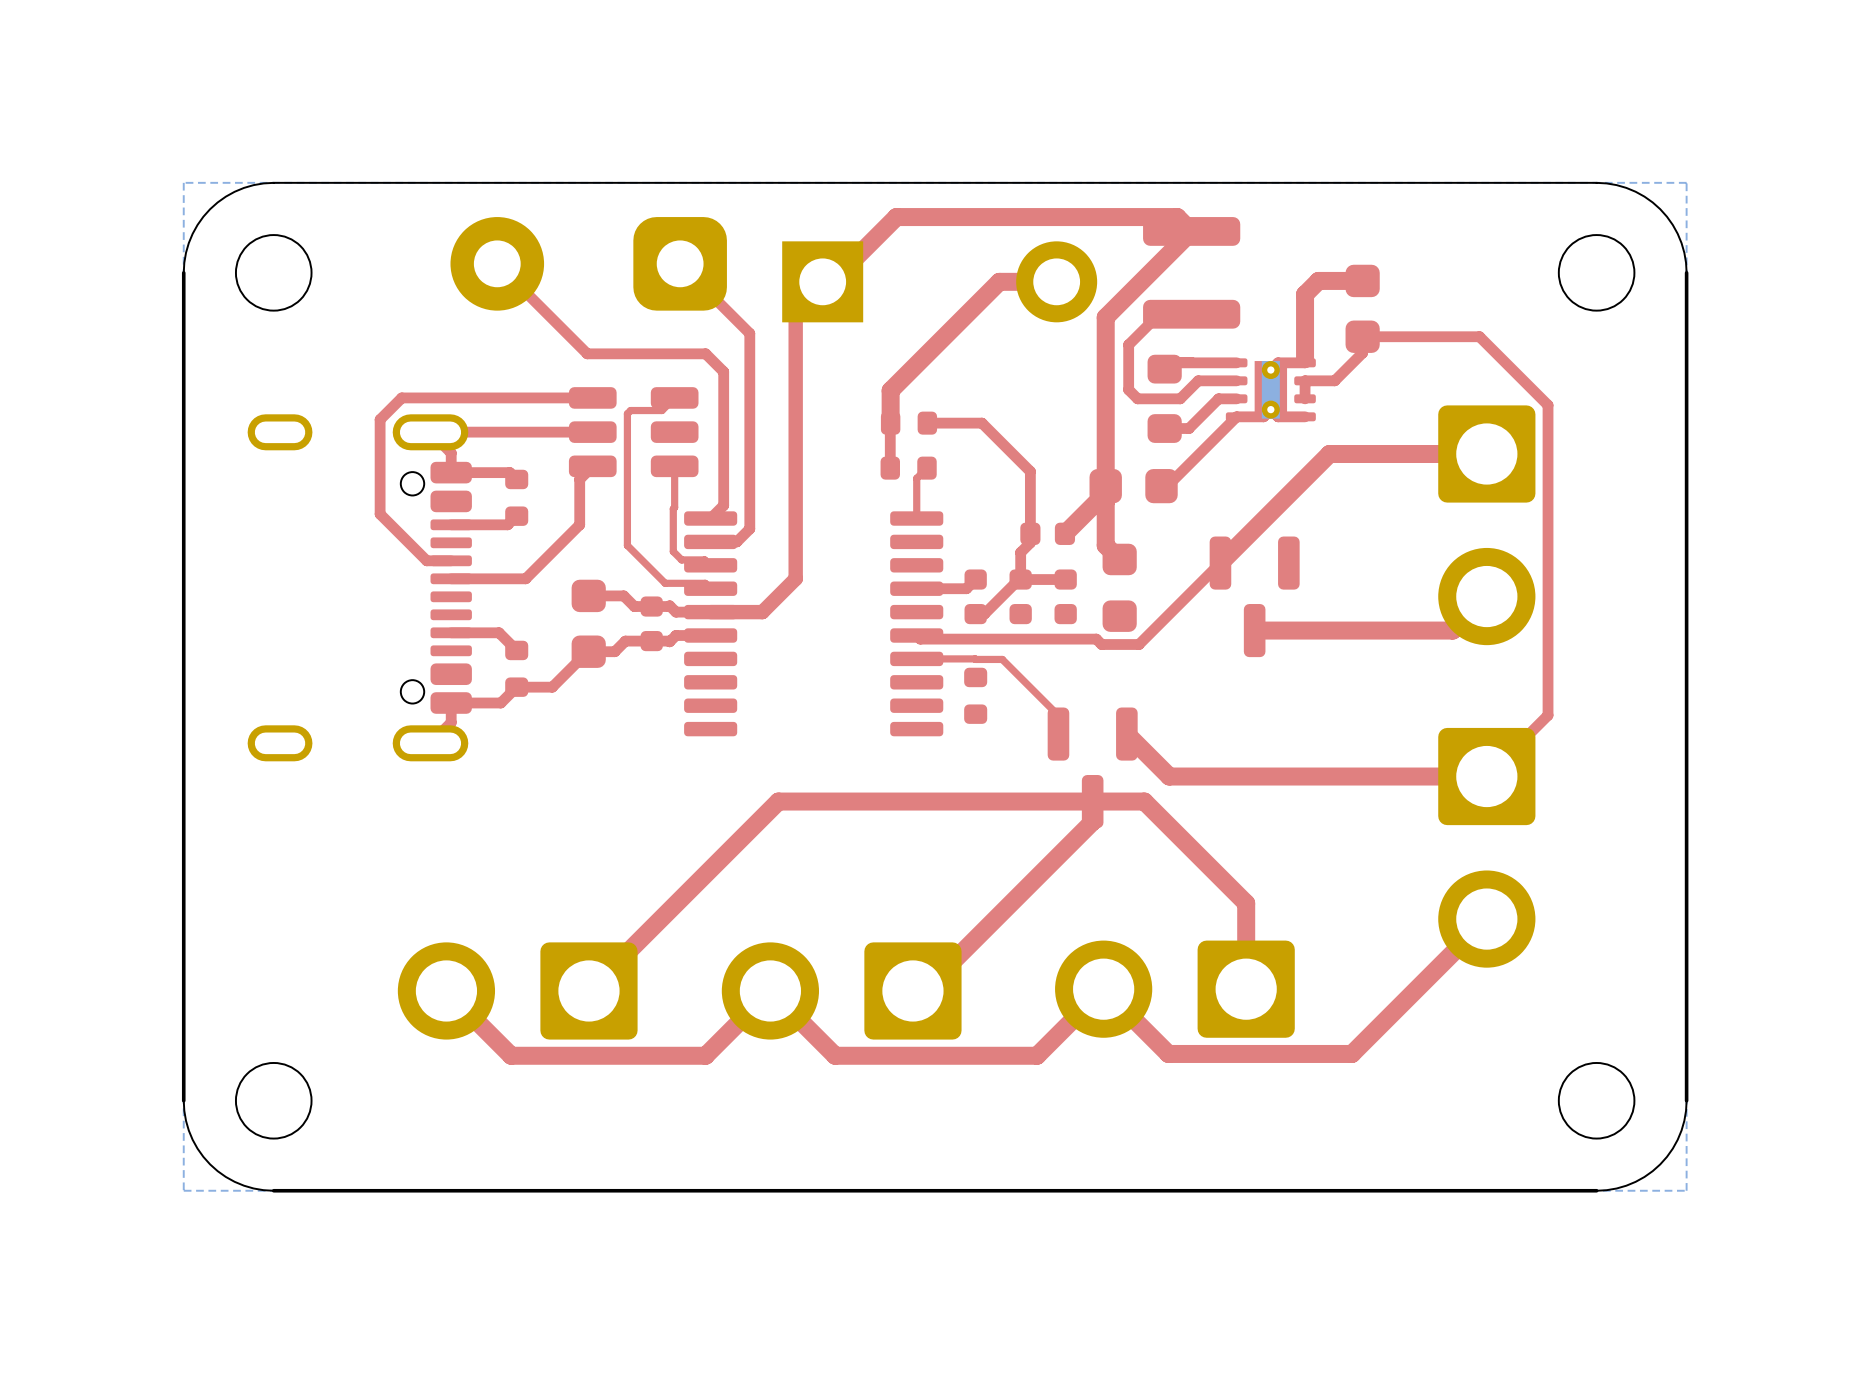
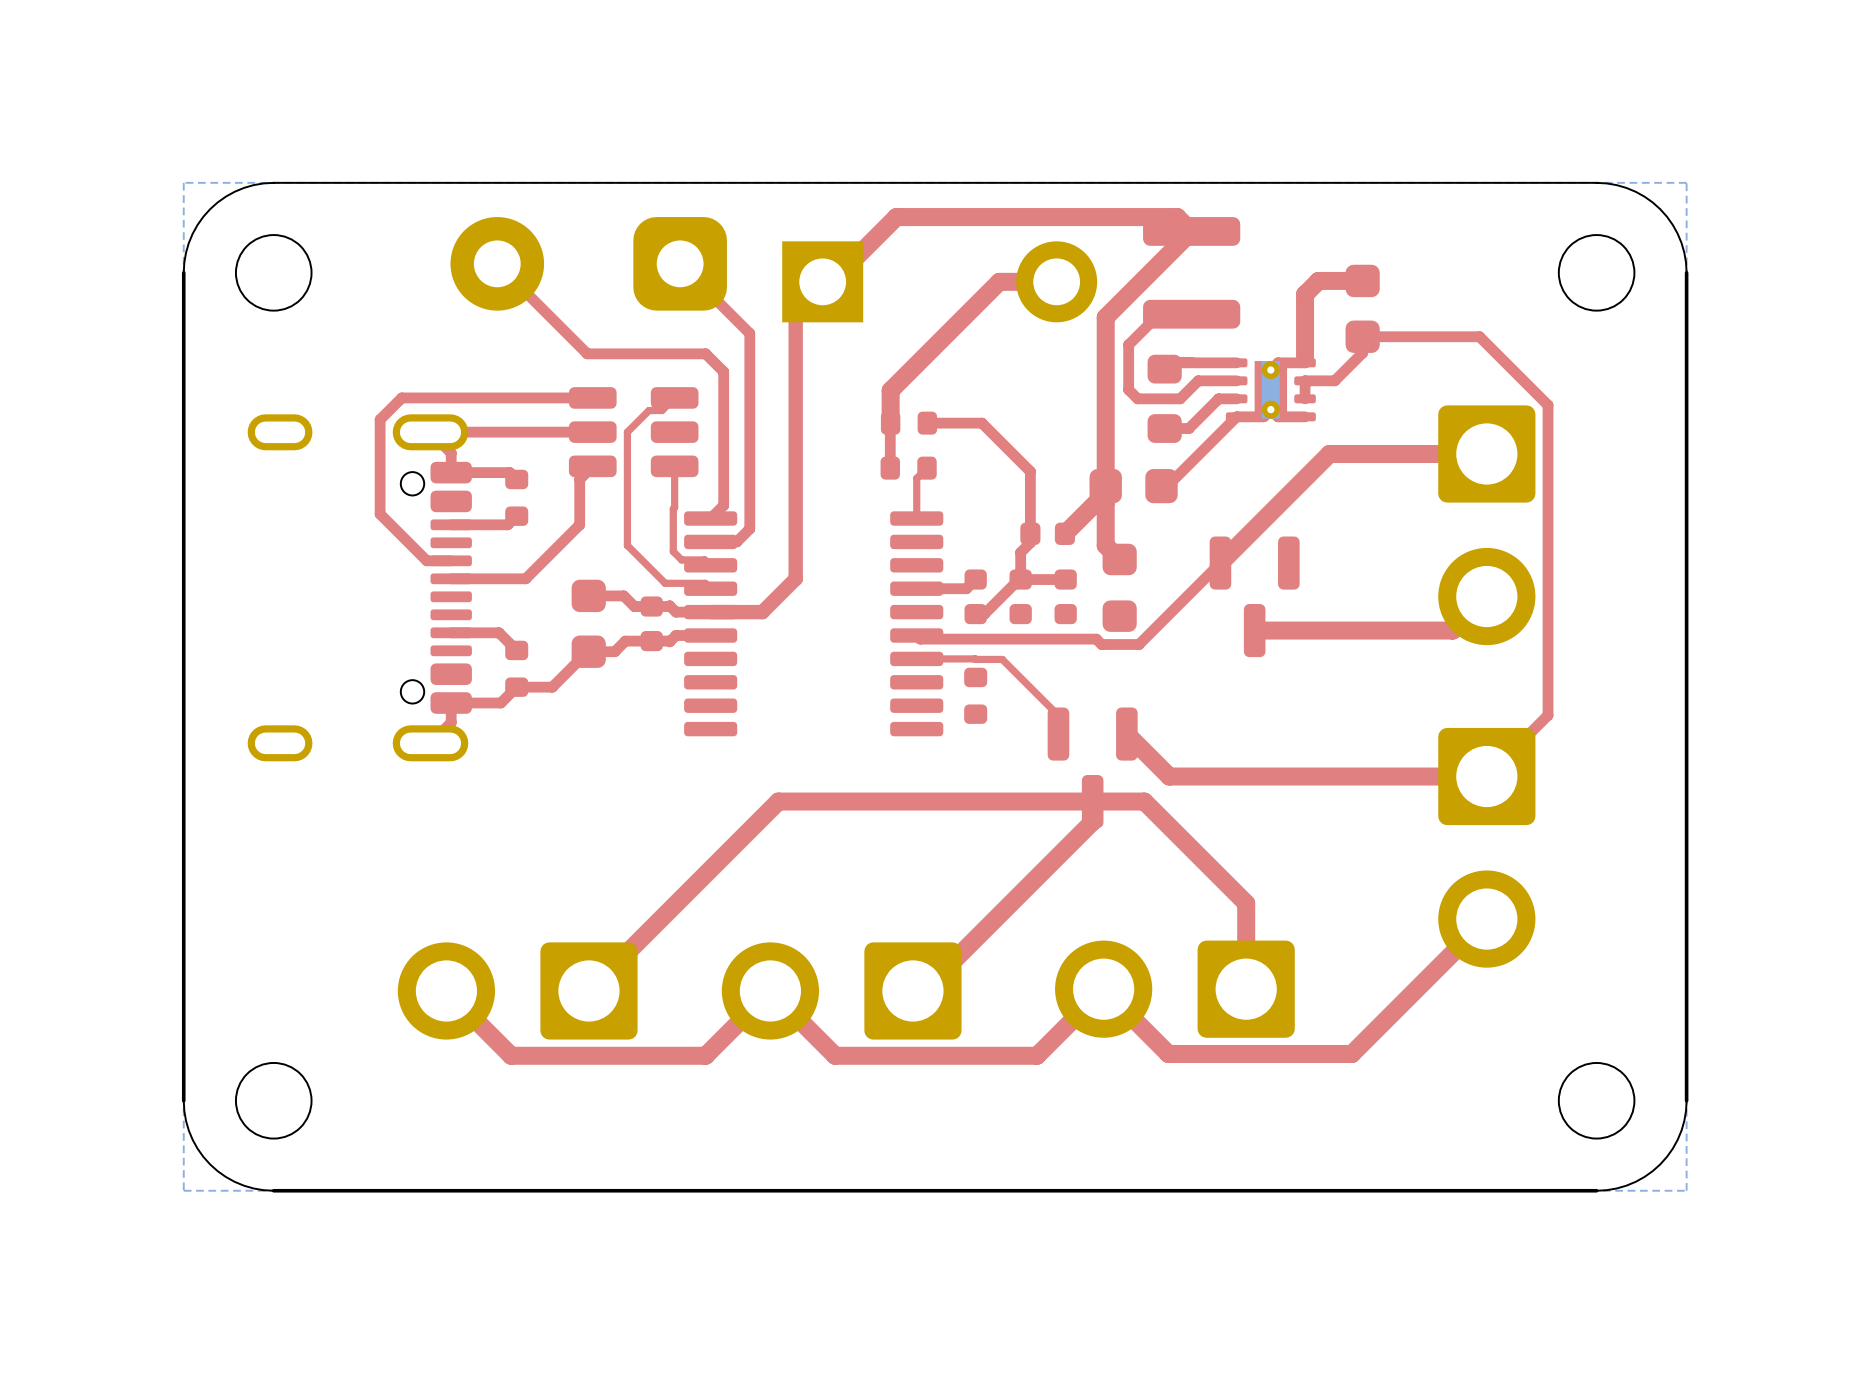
top track: (649, 410) (630, 410) (627, 413) (627, 432) -> (649, 410) (627, 432)

